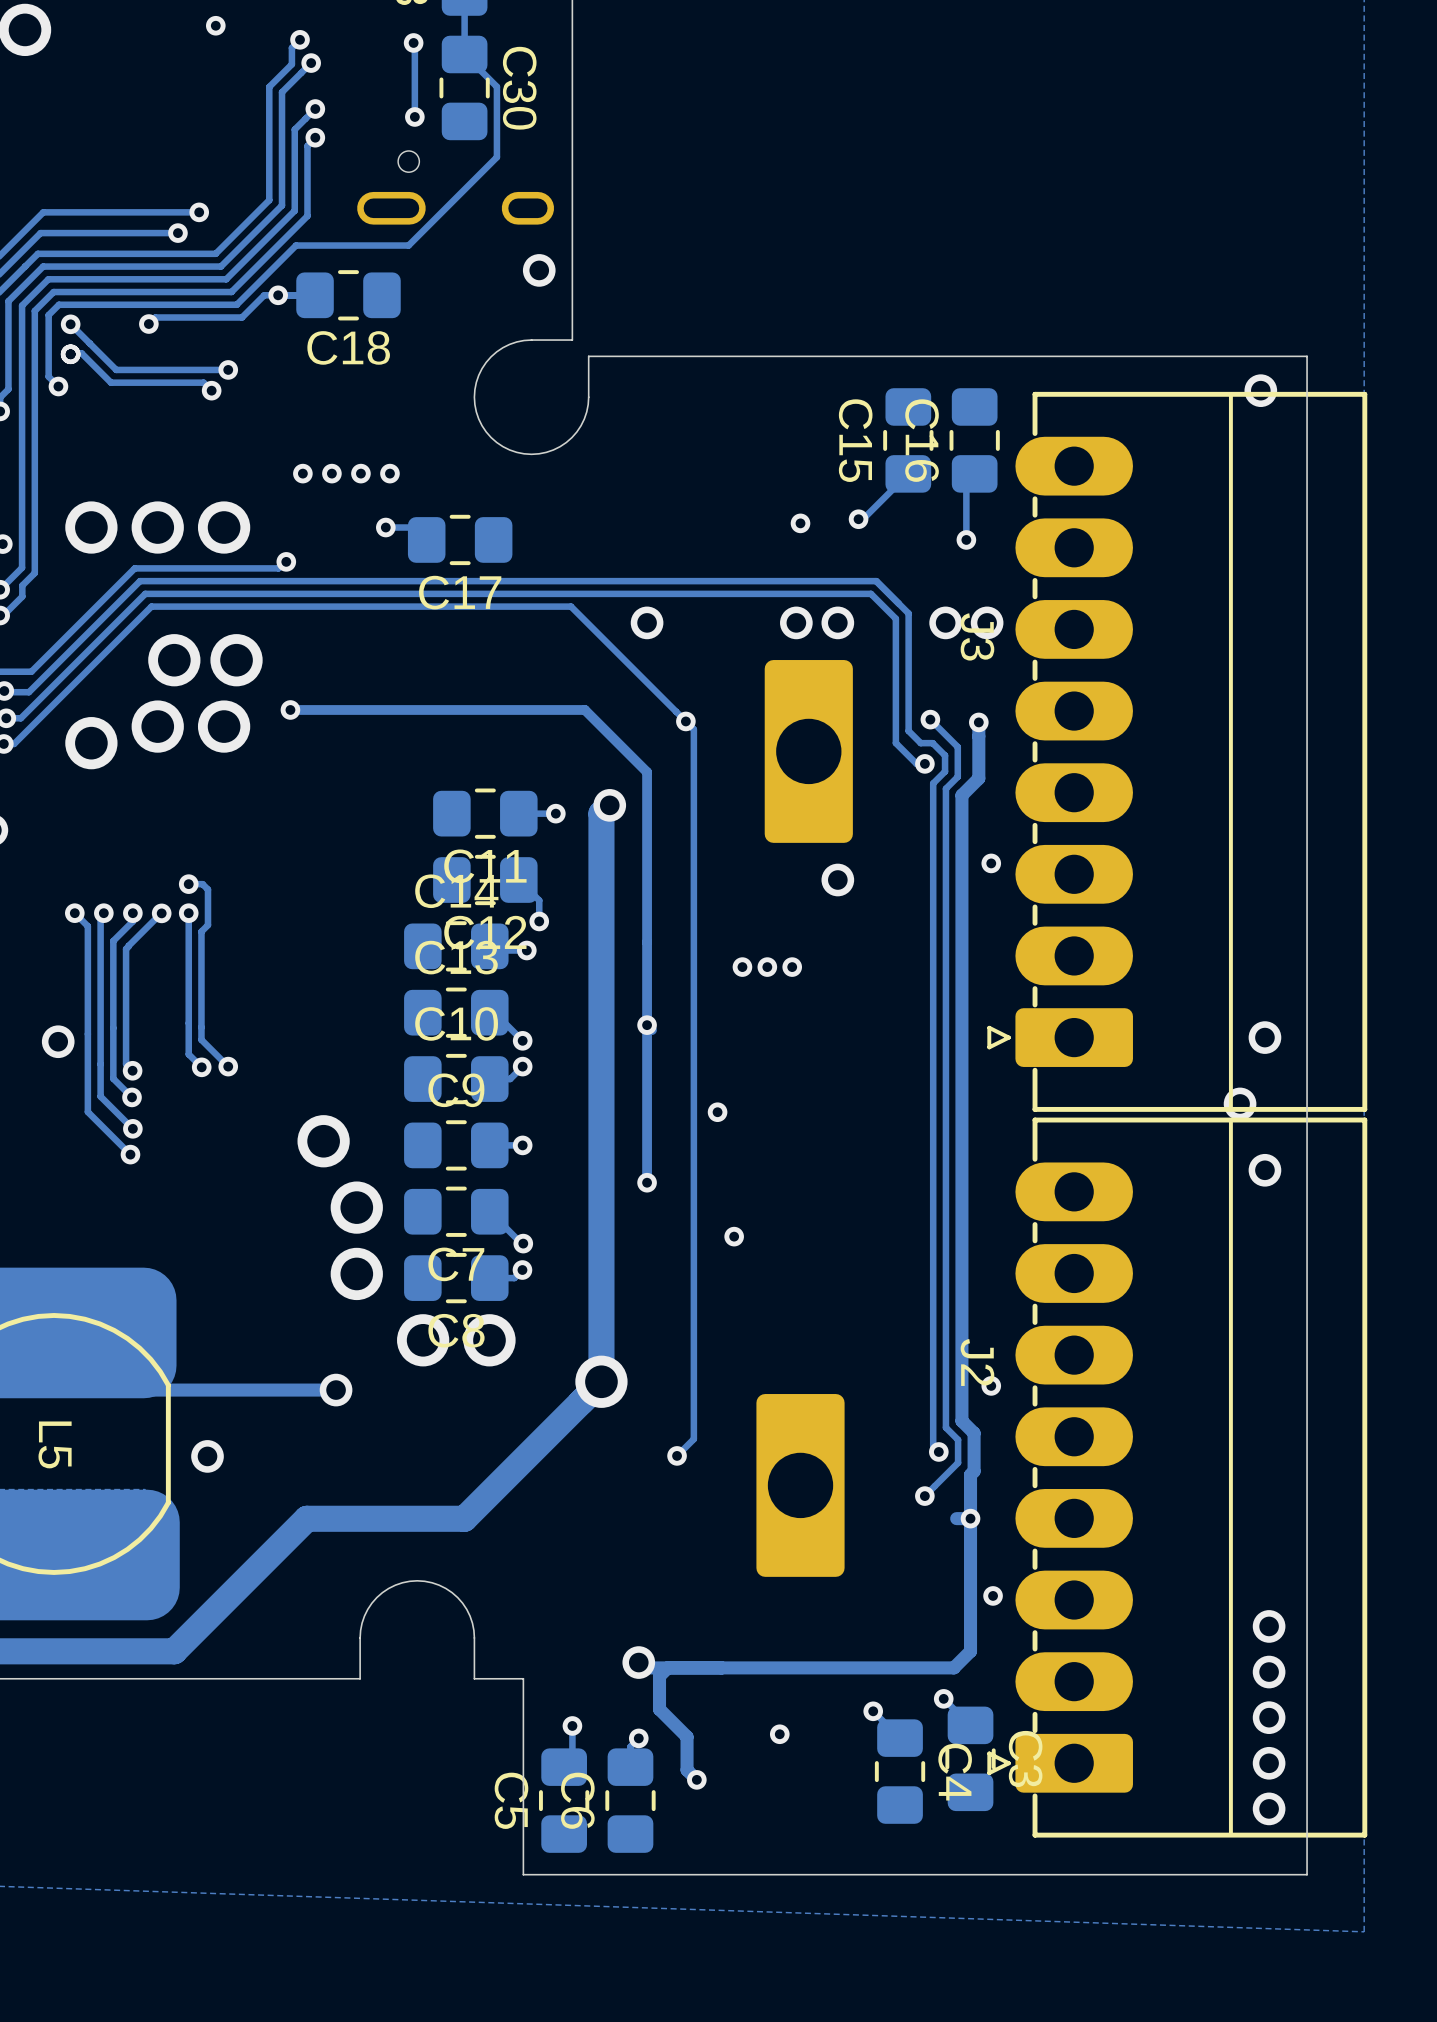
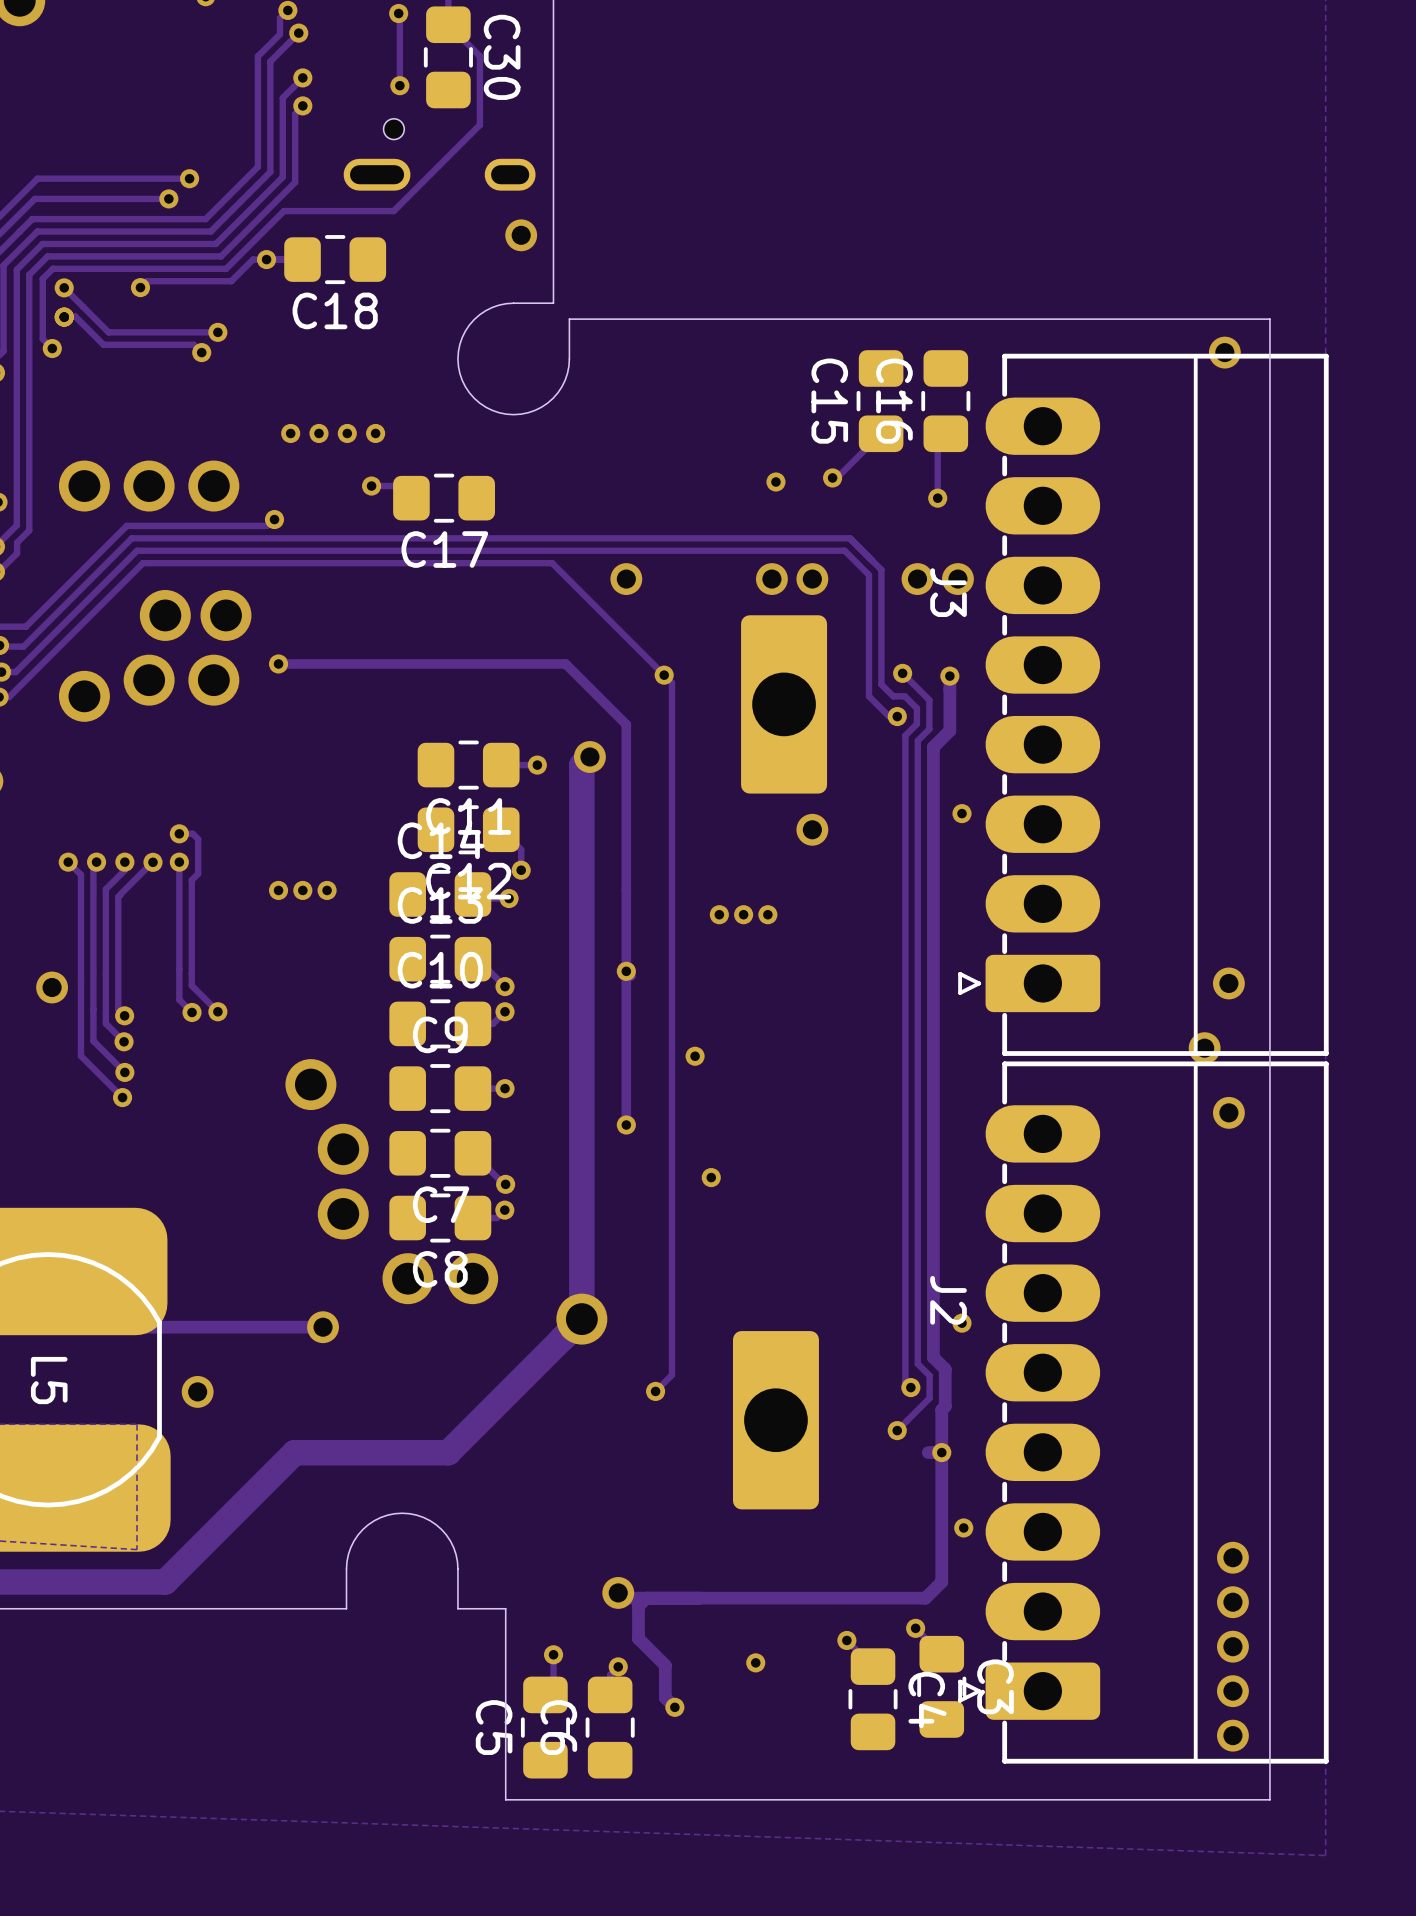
via: none -> (278, 890)
via: none -> (302, 890)
via: none -> (327, 890)

